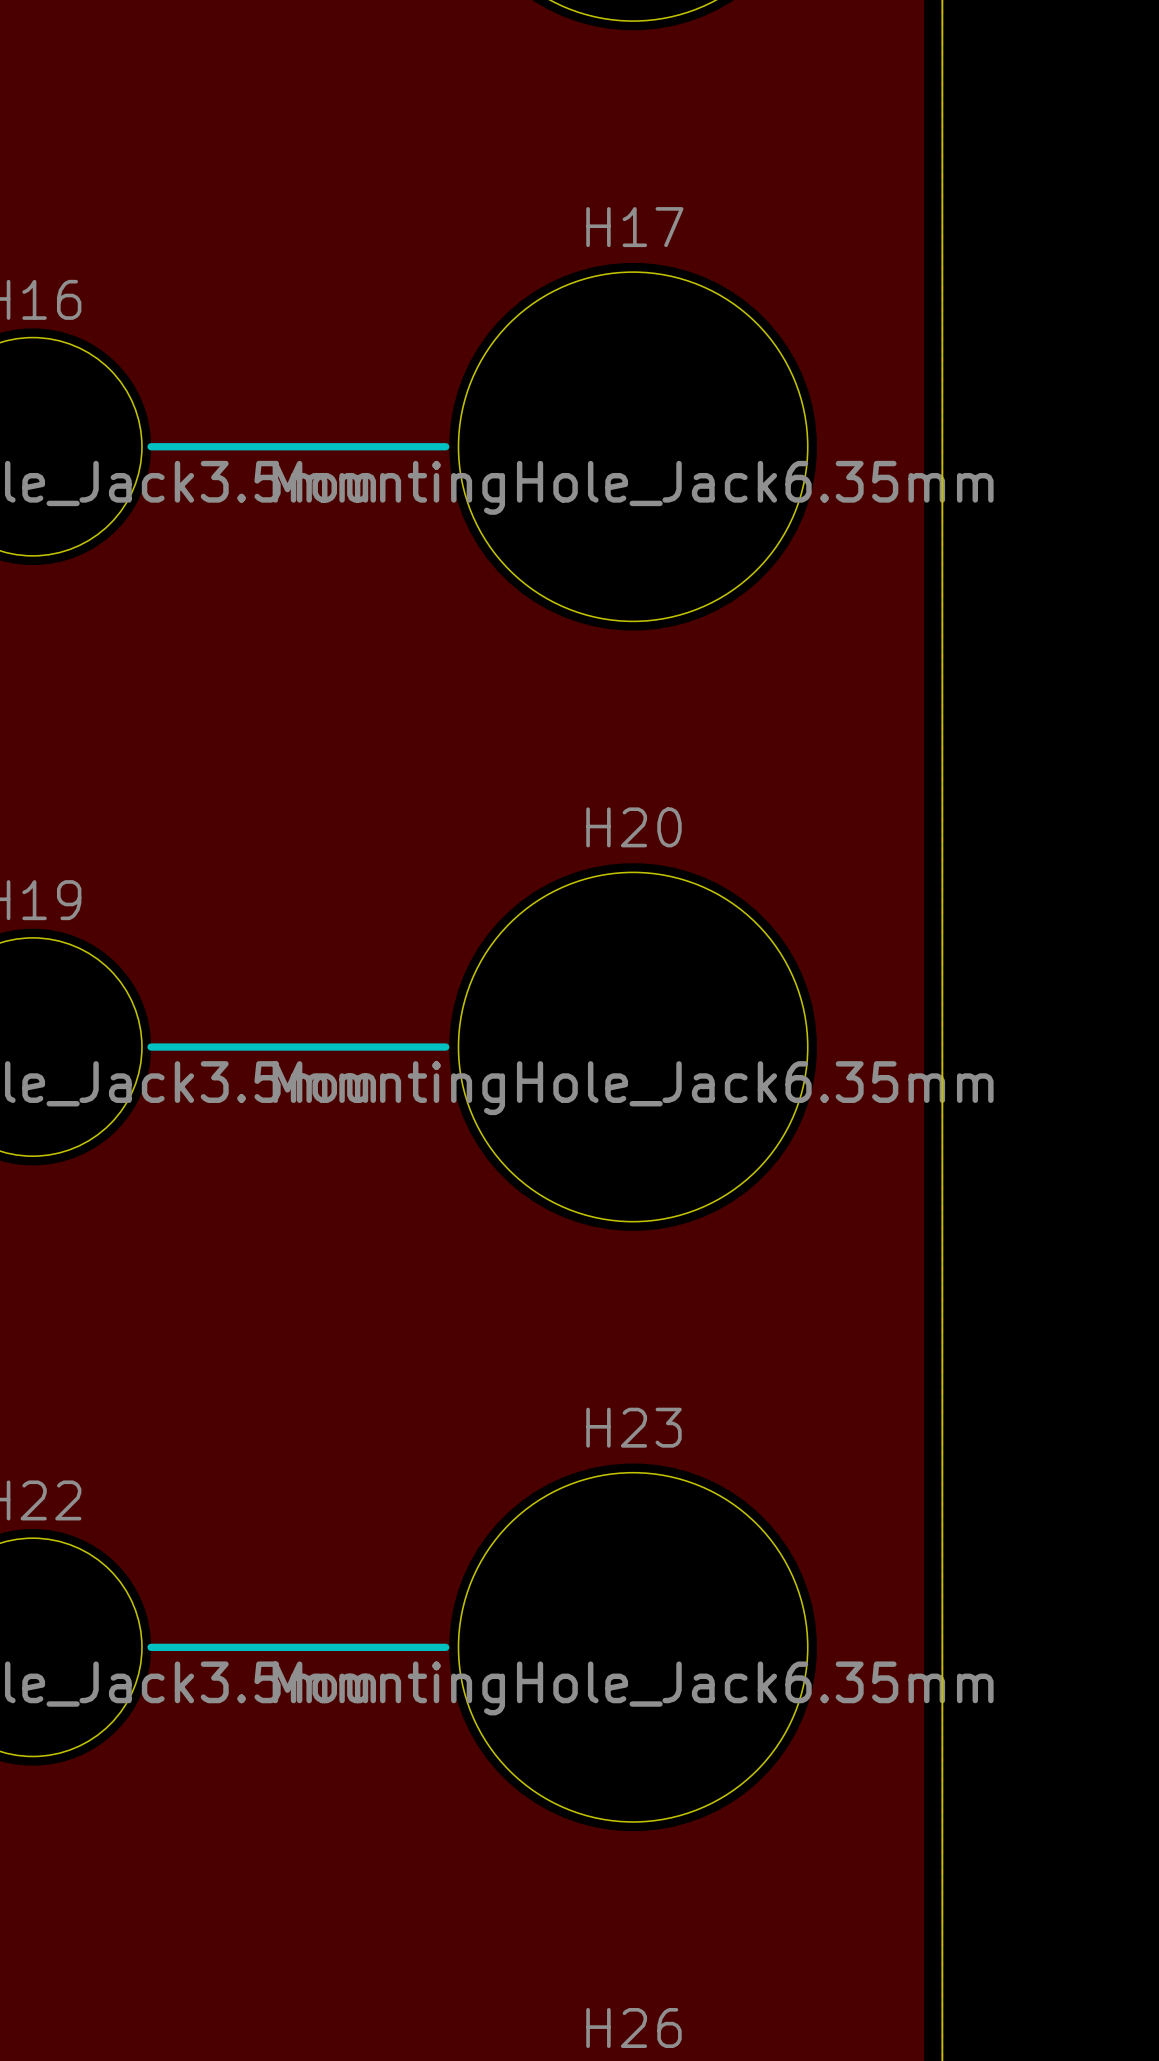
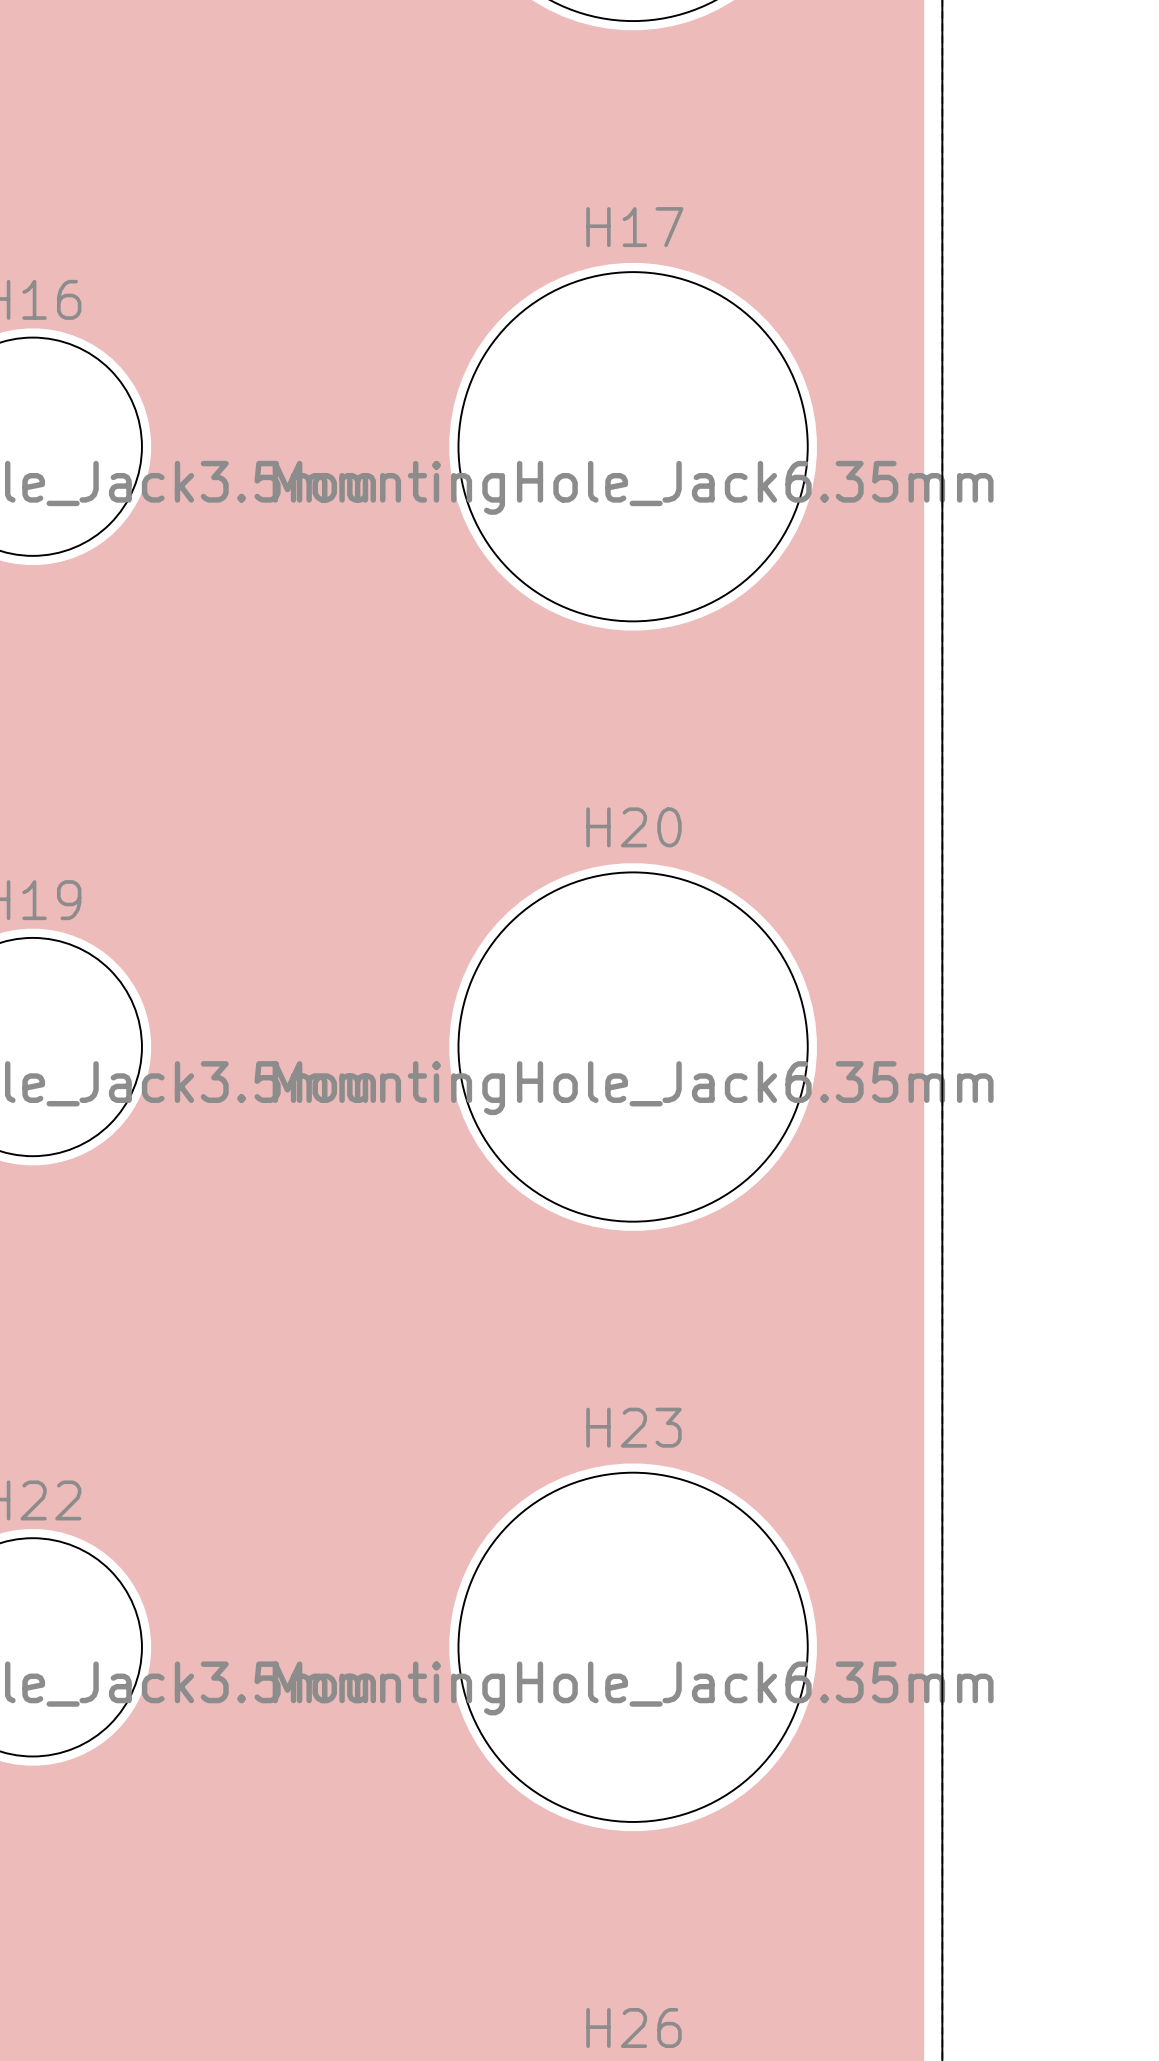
line: (151, 446) (445, 446) -> none
line: (151, 1047) (445, 1047) -> none
line: (151, 1647) (445, 1647) -> none

